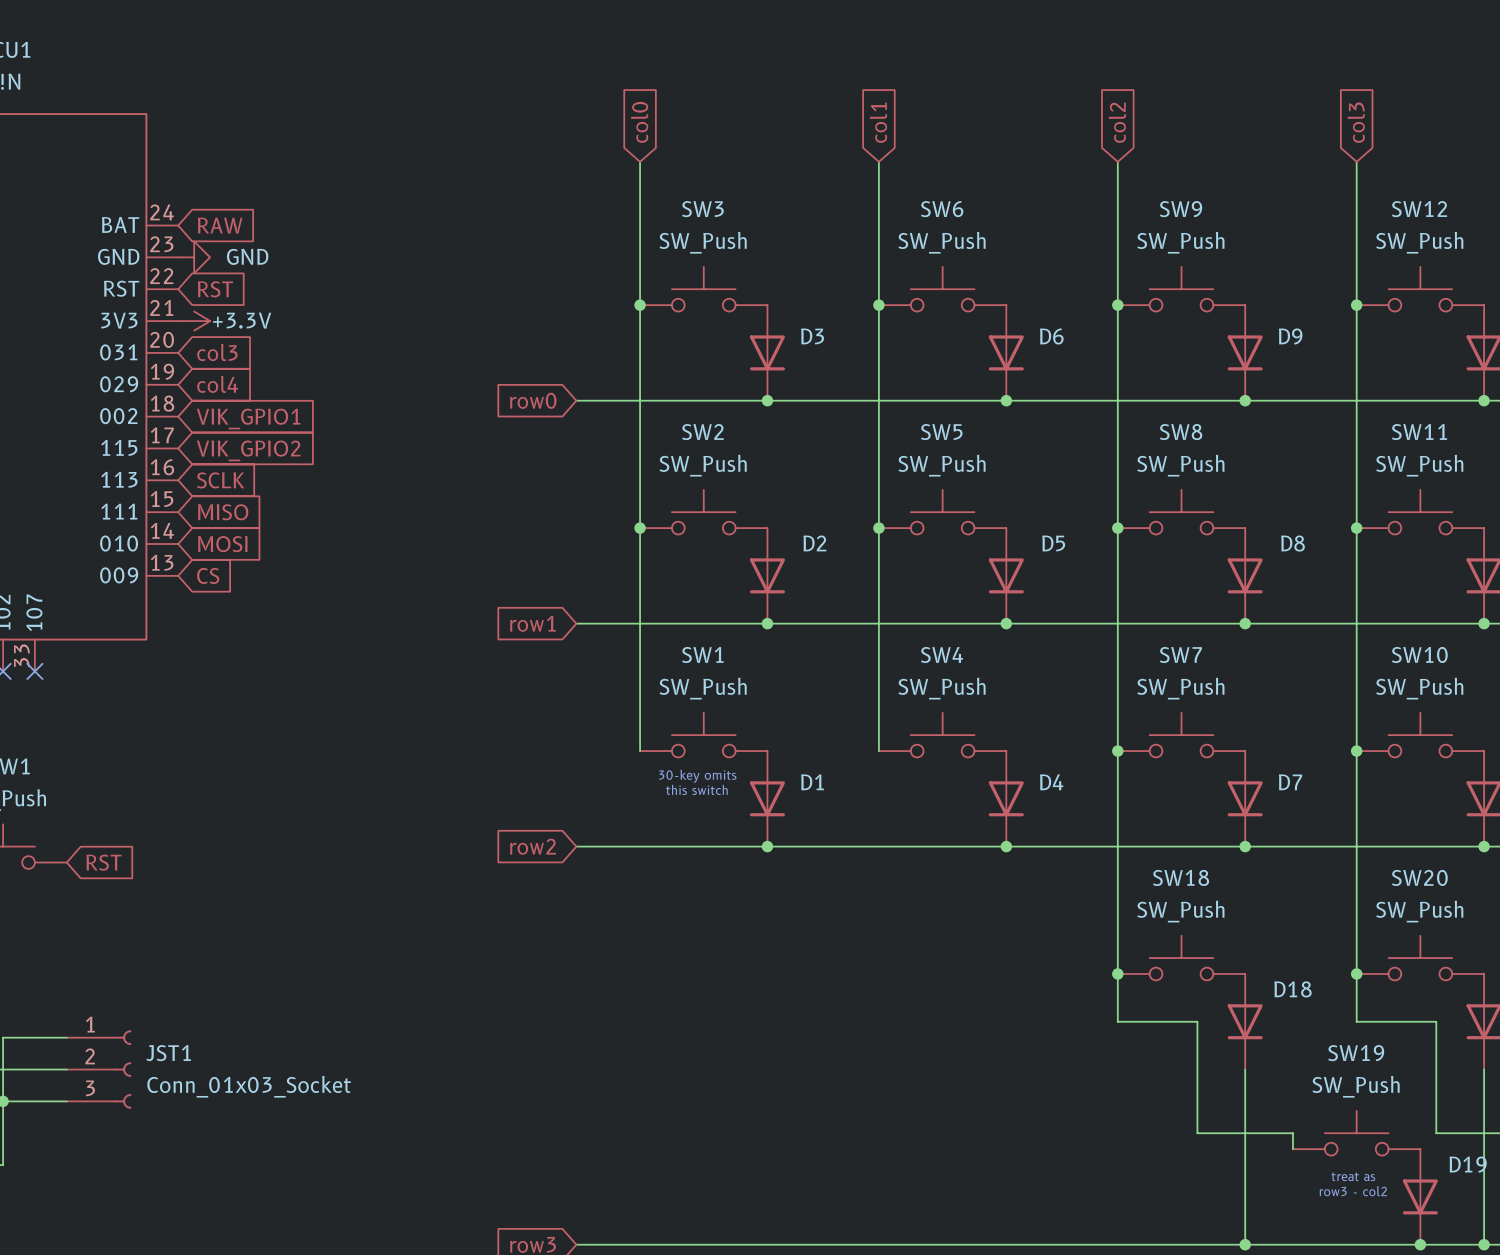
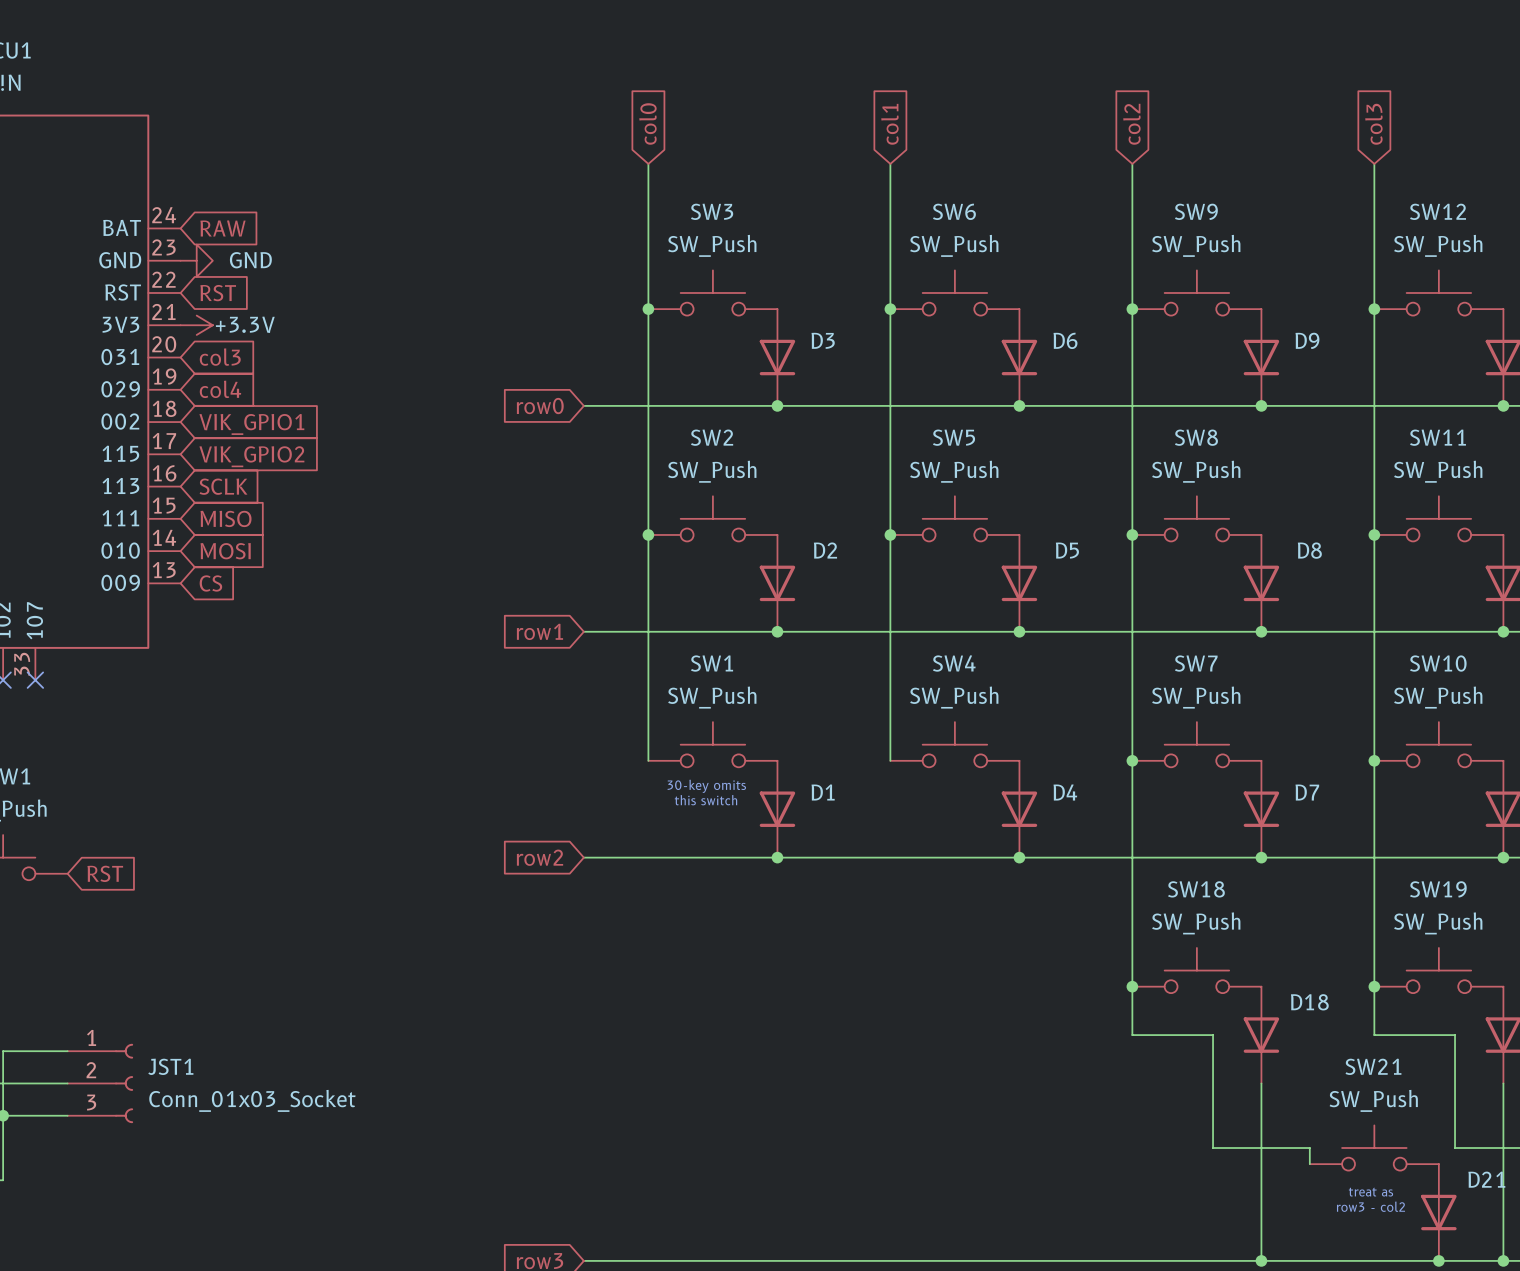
SW20 name: SW20 (1419, 877) -> SW19 (1438, 889)
SW19 name: SW19 (1356, 1053) -> SW21 (1373, 1066)
D19 name: D19 (1468, 1164) -> D21 (1486, 1179)

